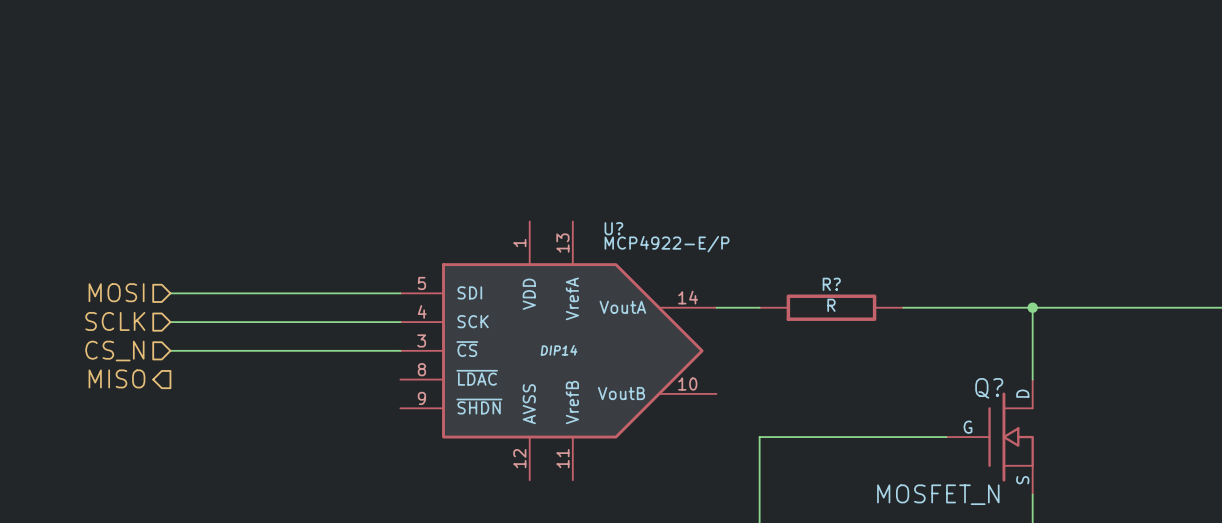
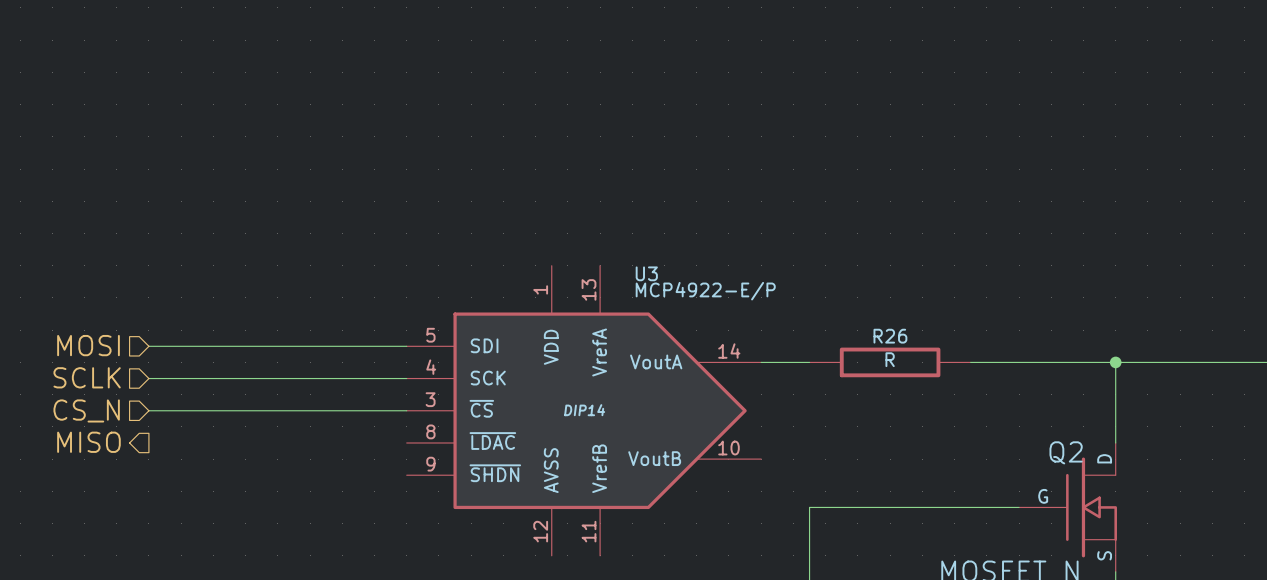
U? name: U? (613, 228) -> U3 (646, 273)
R? name: R? (831, 284) -> R26 (890, 336)
Q? name: Q? (989, 388) -> Q2 (1066, 452)

